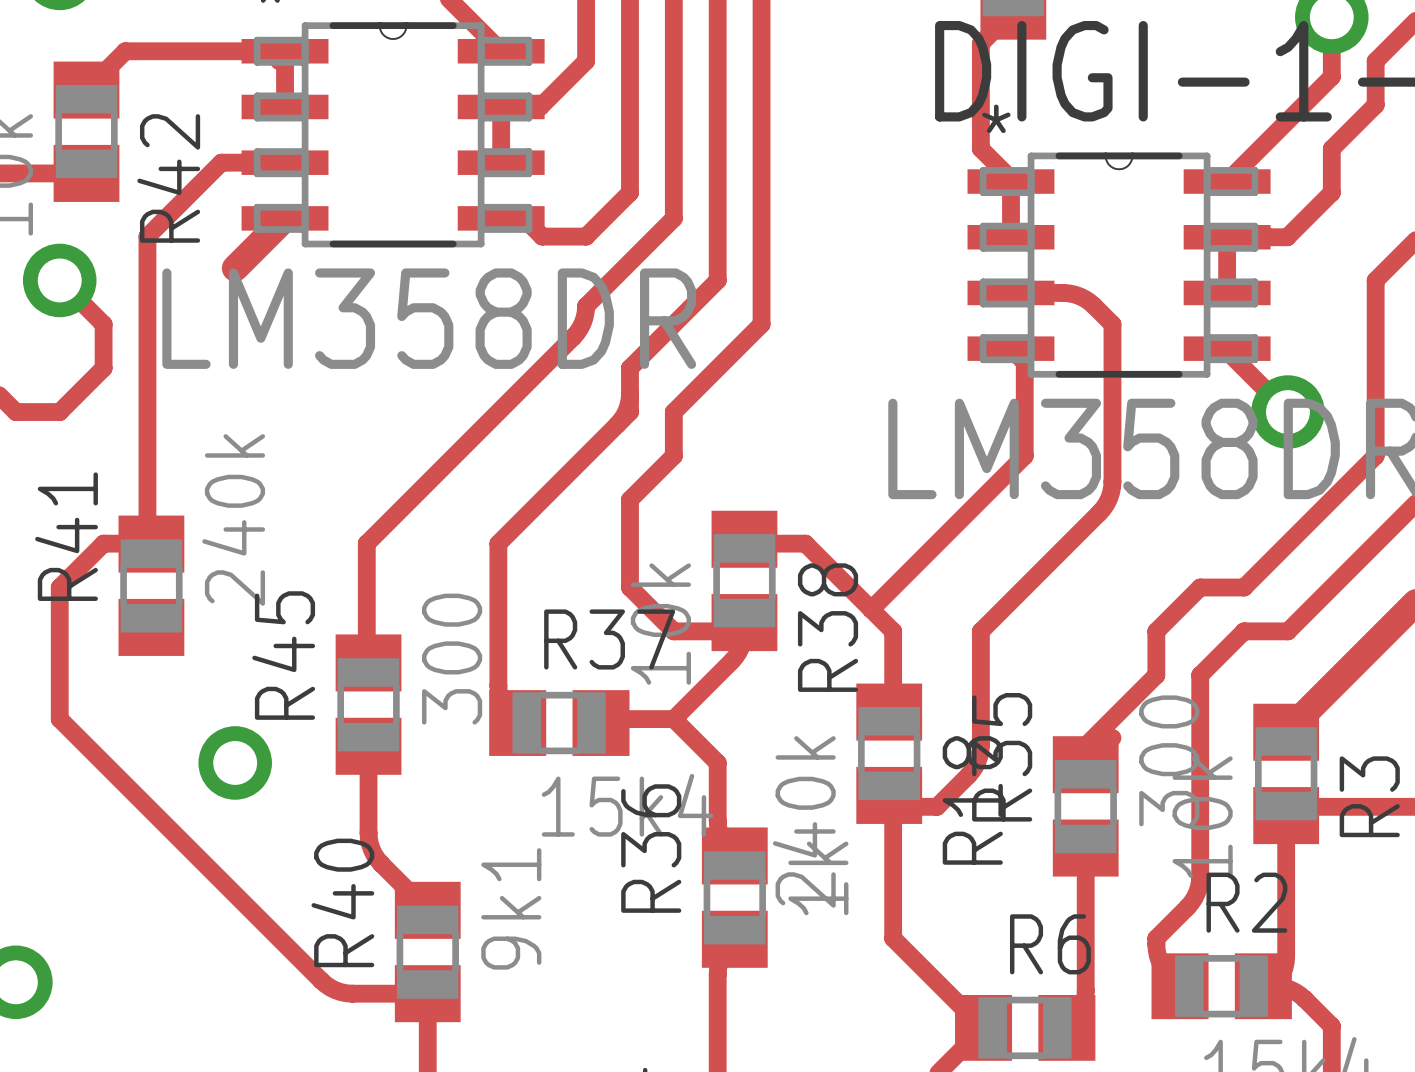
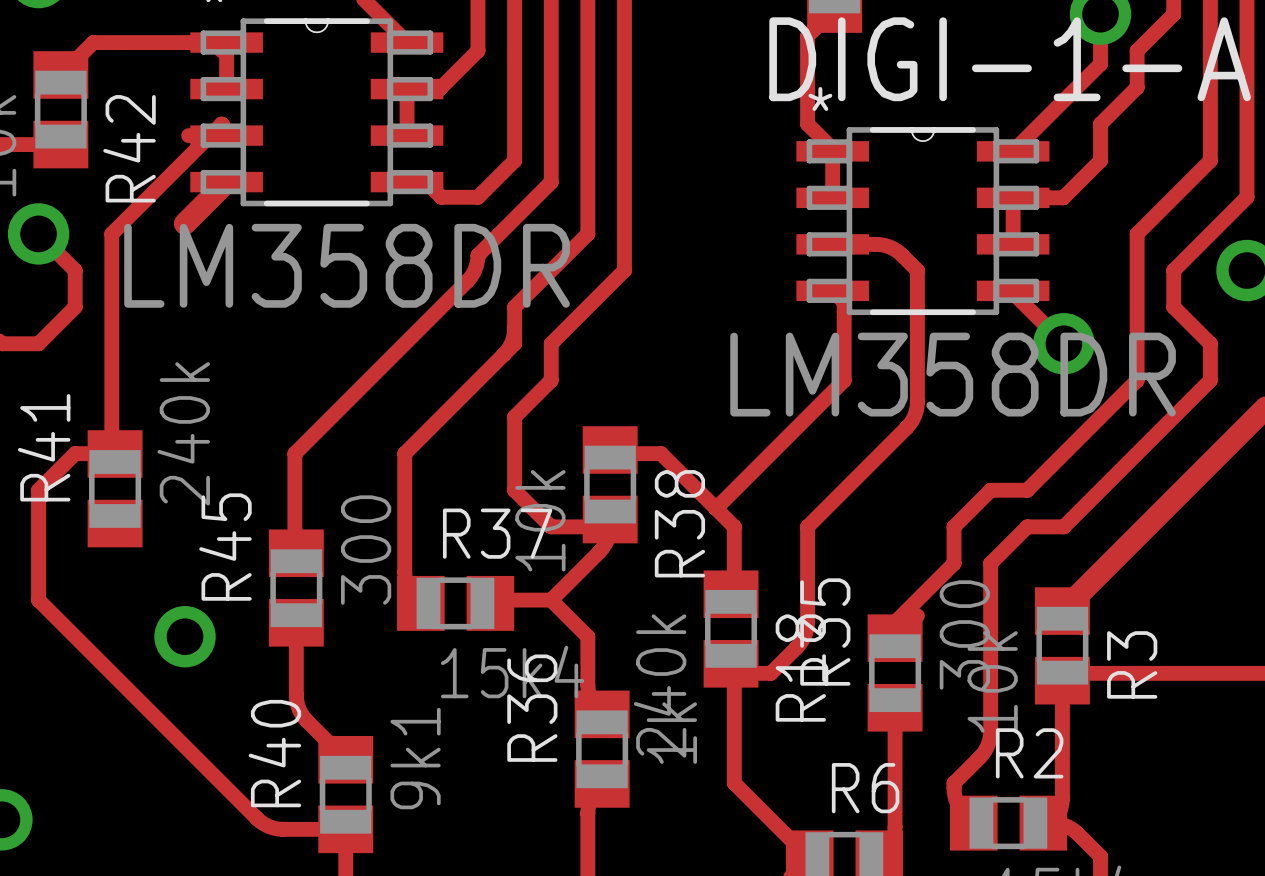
track: (239, 162) (221, 162) (147, 236) (147, 280) -> (221, 124) (111, 233)

